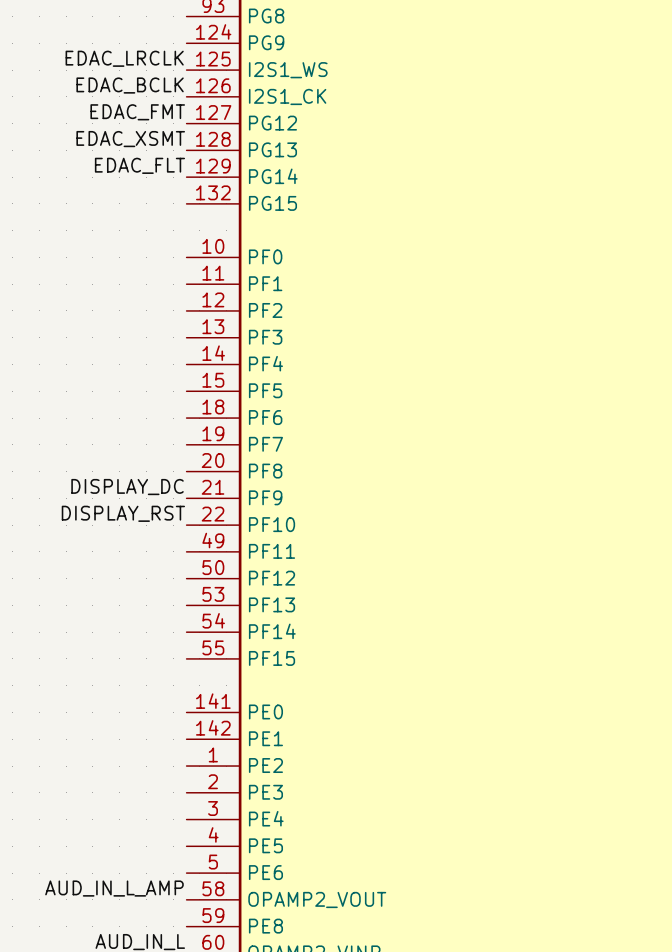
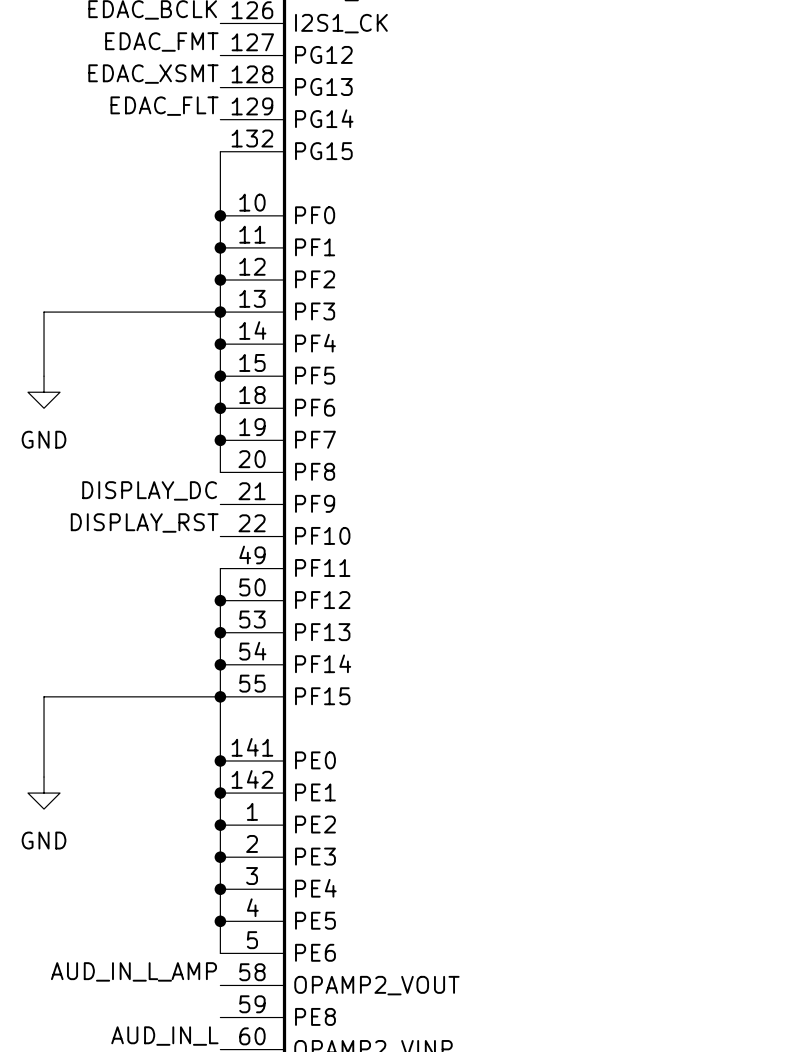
wire: none -> (220, 151) (220, 472)
junction: none -> (220, 215)
junction: none -> (220, 247)
junction: none -> (220, 280)
wire: none -> (220, 312) (44, 312) (44, 376)
junction: none -> (220, 312)
junction: none -> (220, 344)
junction: none -> (220, 376)
power symbol: none -> GND (44, 392)
junction: none -> (220, 408)
junction: none -> (220, 440)
wire: none -> (220, 568) (220, 953)
junction: none -> (220, 600)
junction: none -> (220, 632)
junction: none -> (220, 664)
wire: none -> (220, 696) (44, 696) (44, 777)
junction: none -> (220, 696)
junction: none -> (220, 760)
power symbol: none -> GND (44, 793)
junction: none -> (220, 793)
junction: none -> (220, 825)
junction: none -> (220, 857)
junction: none -> (220, 889)
junction: none -> (220, 921)

